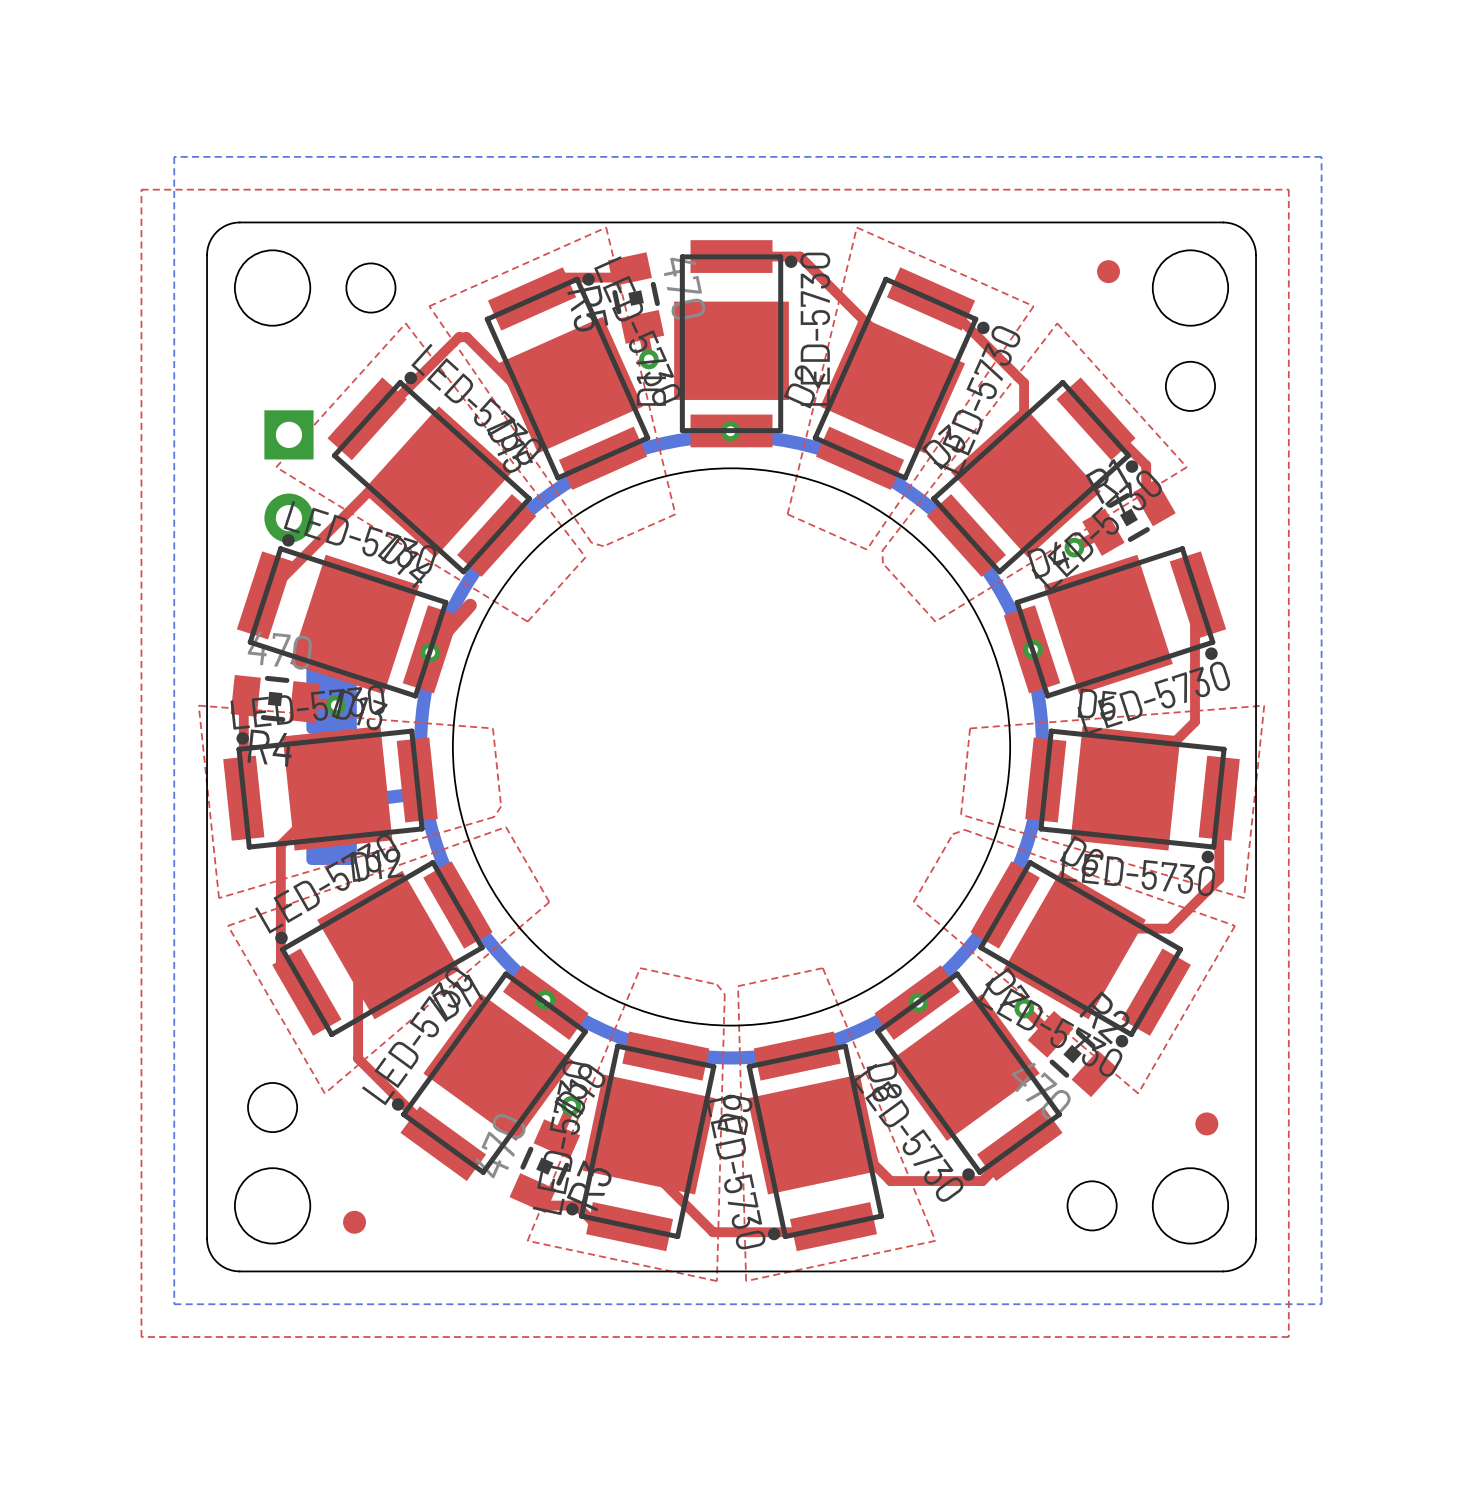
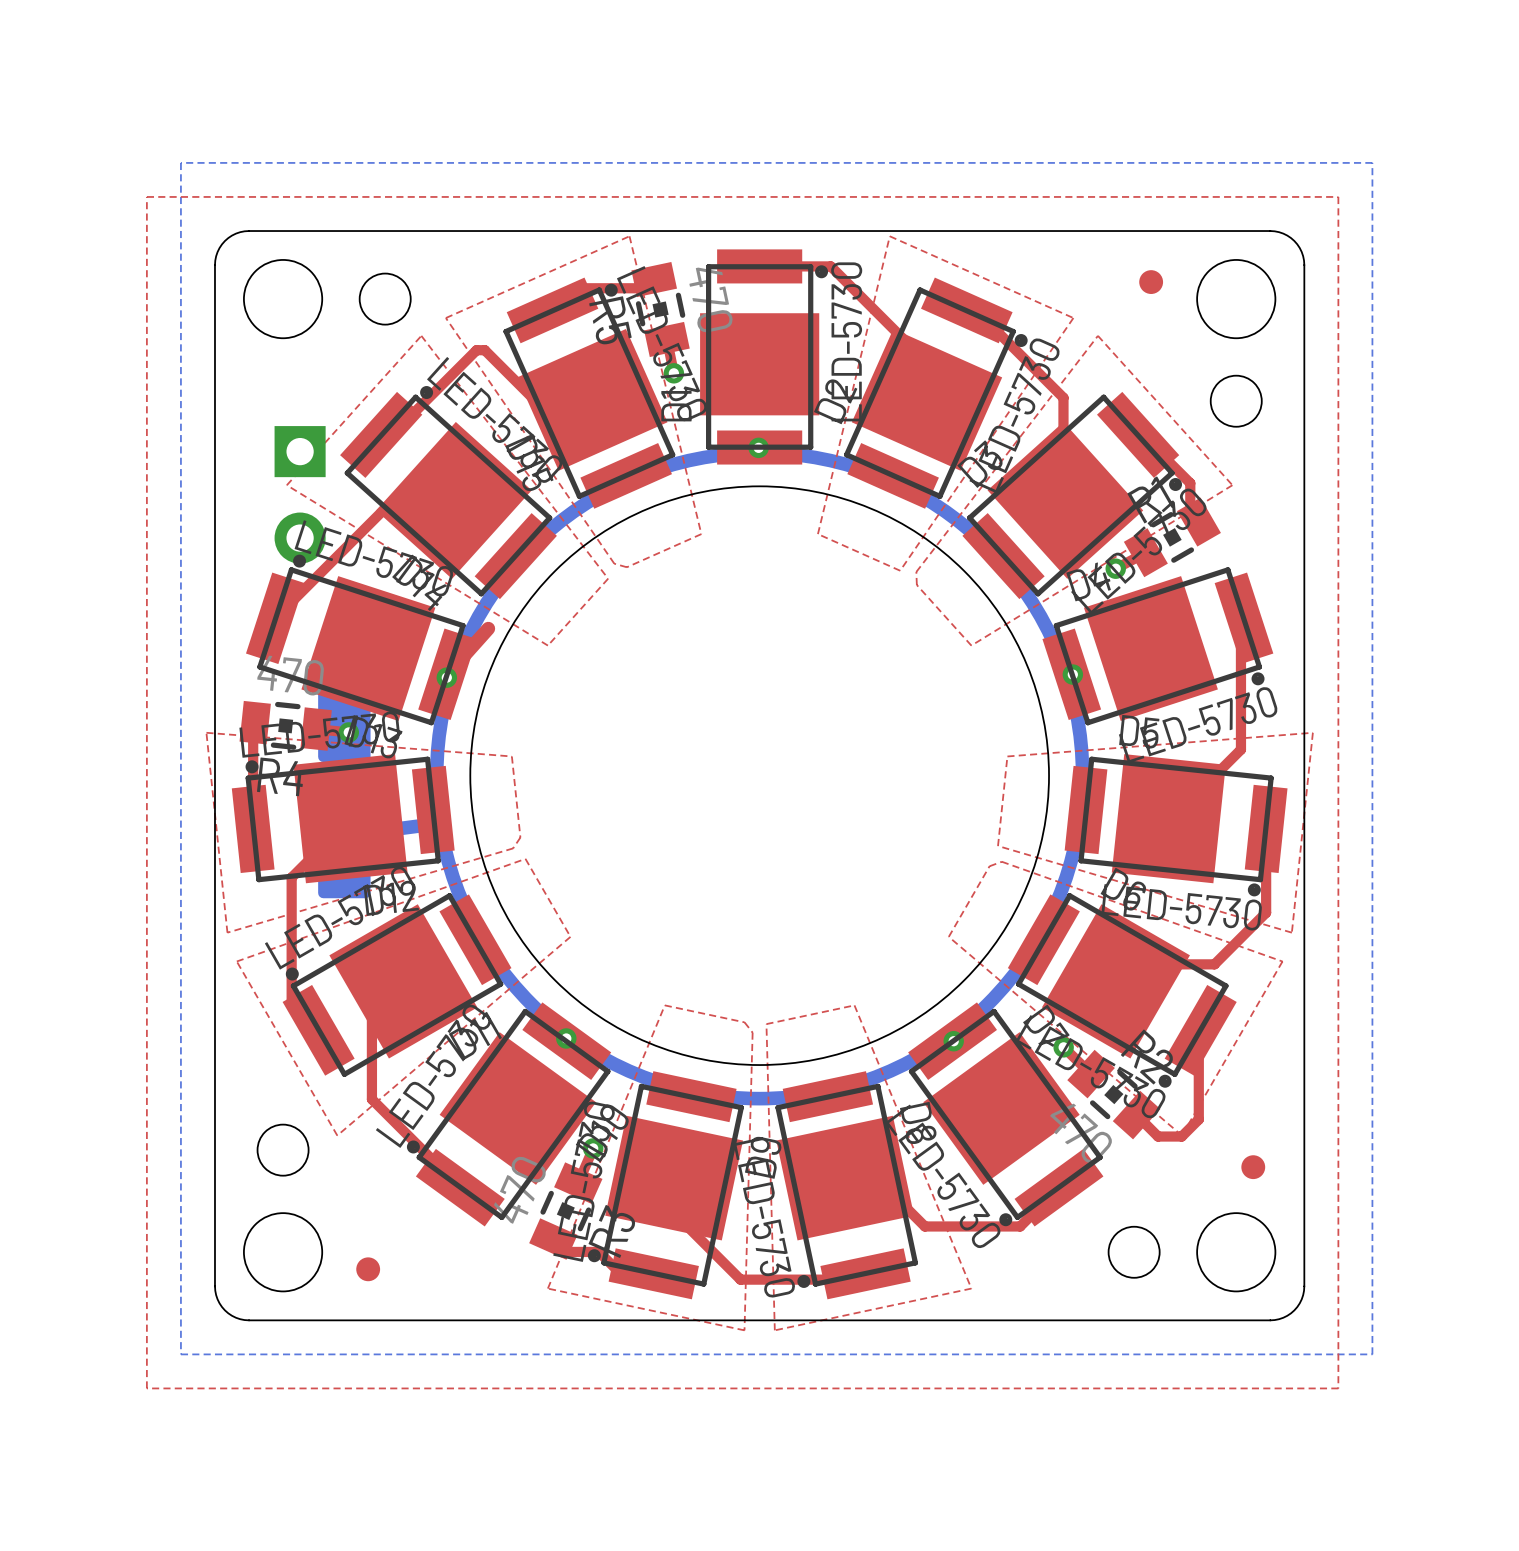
top track: none -> (1200, 1030) (1198, 1032) (1198, 1119) (1181, 1136) (1158, 1136) (1136, 1115)

